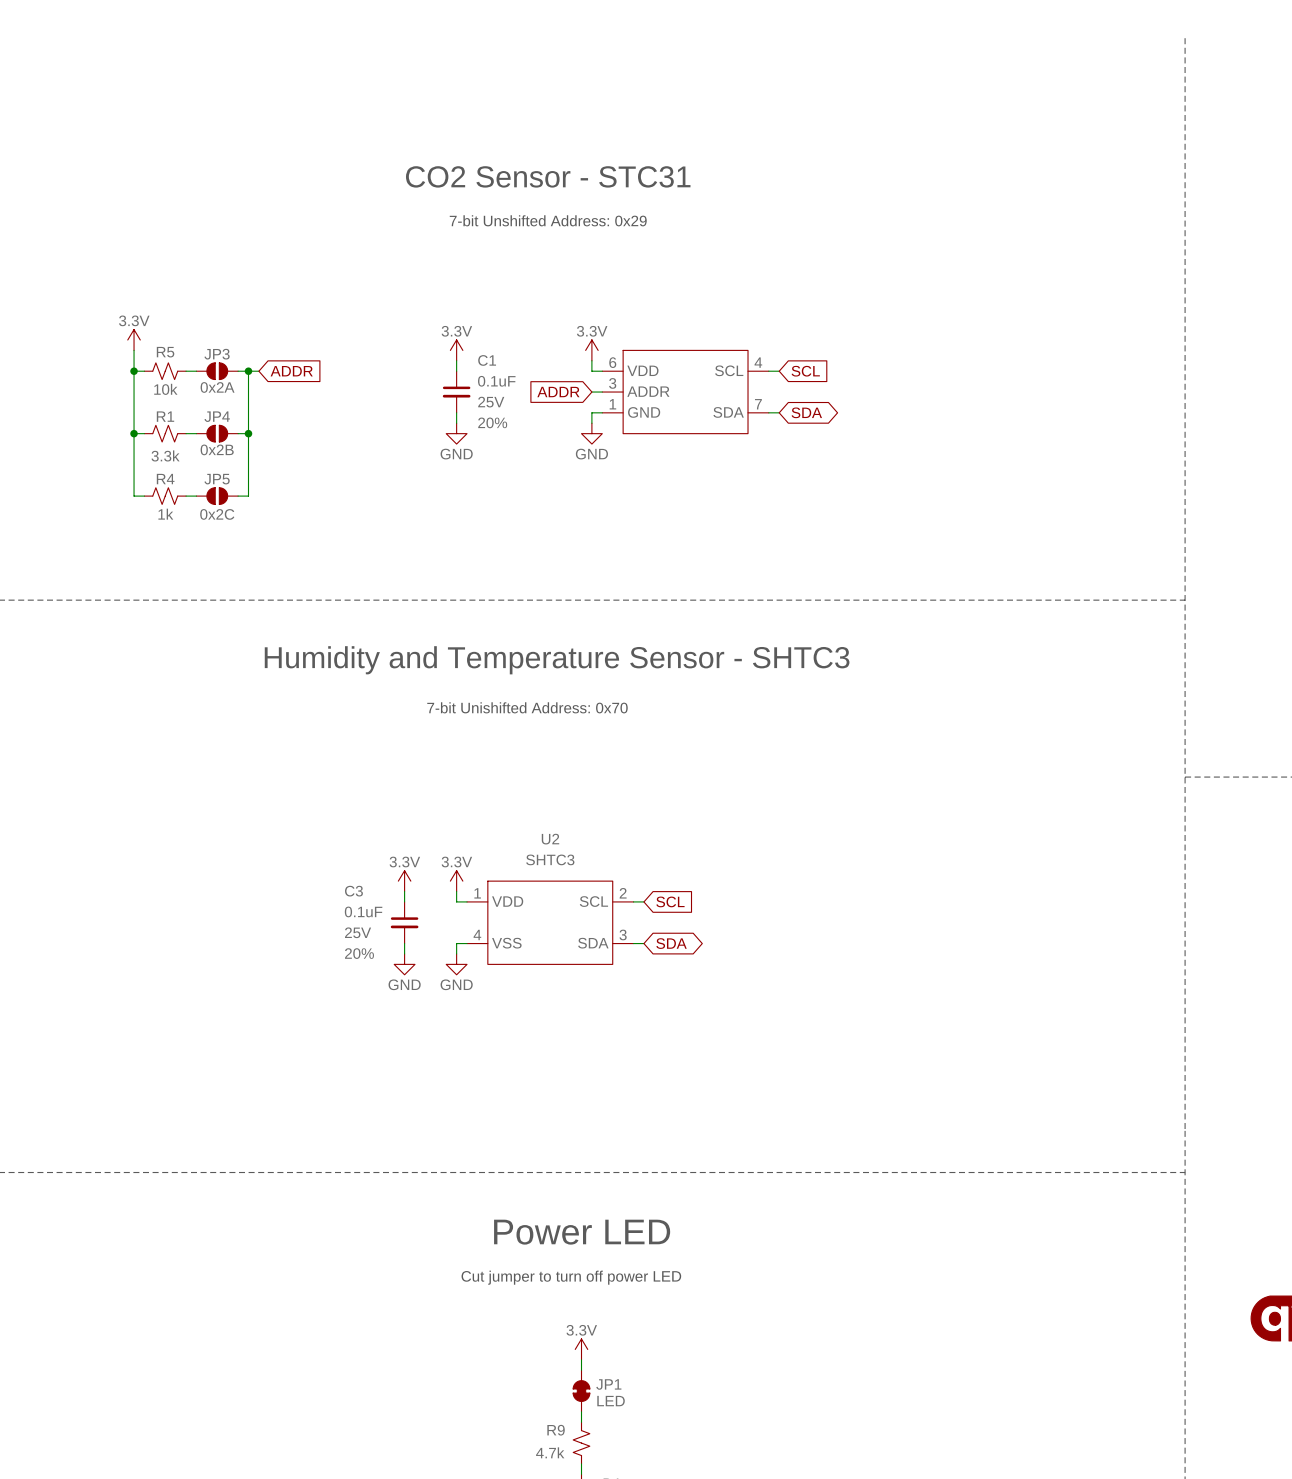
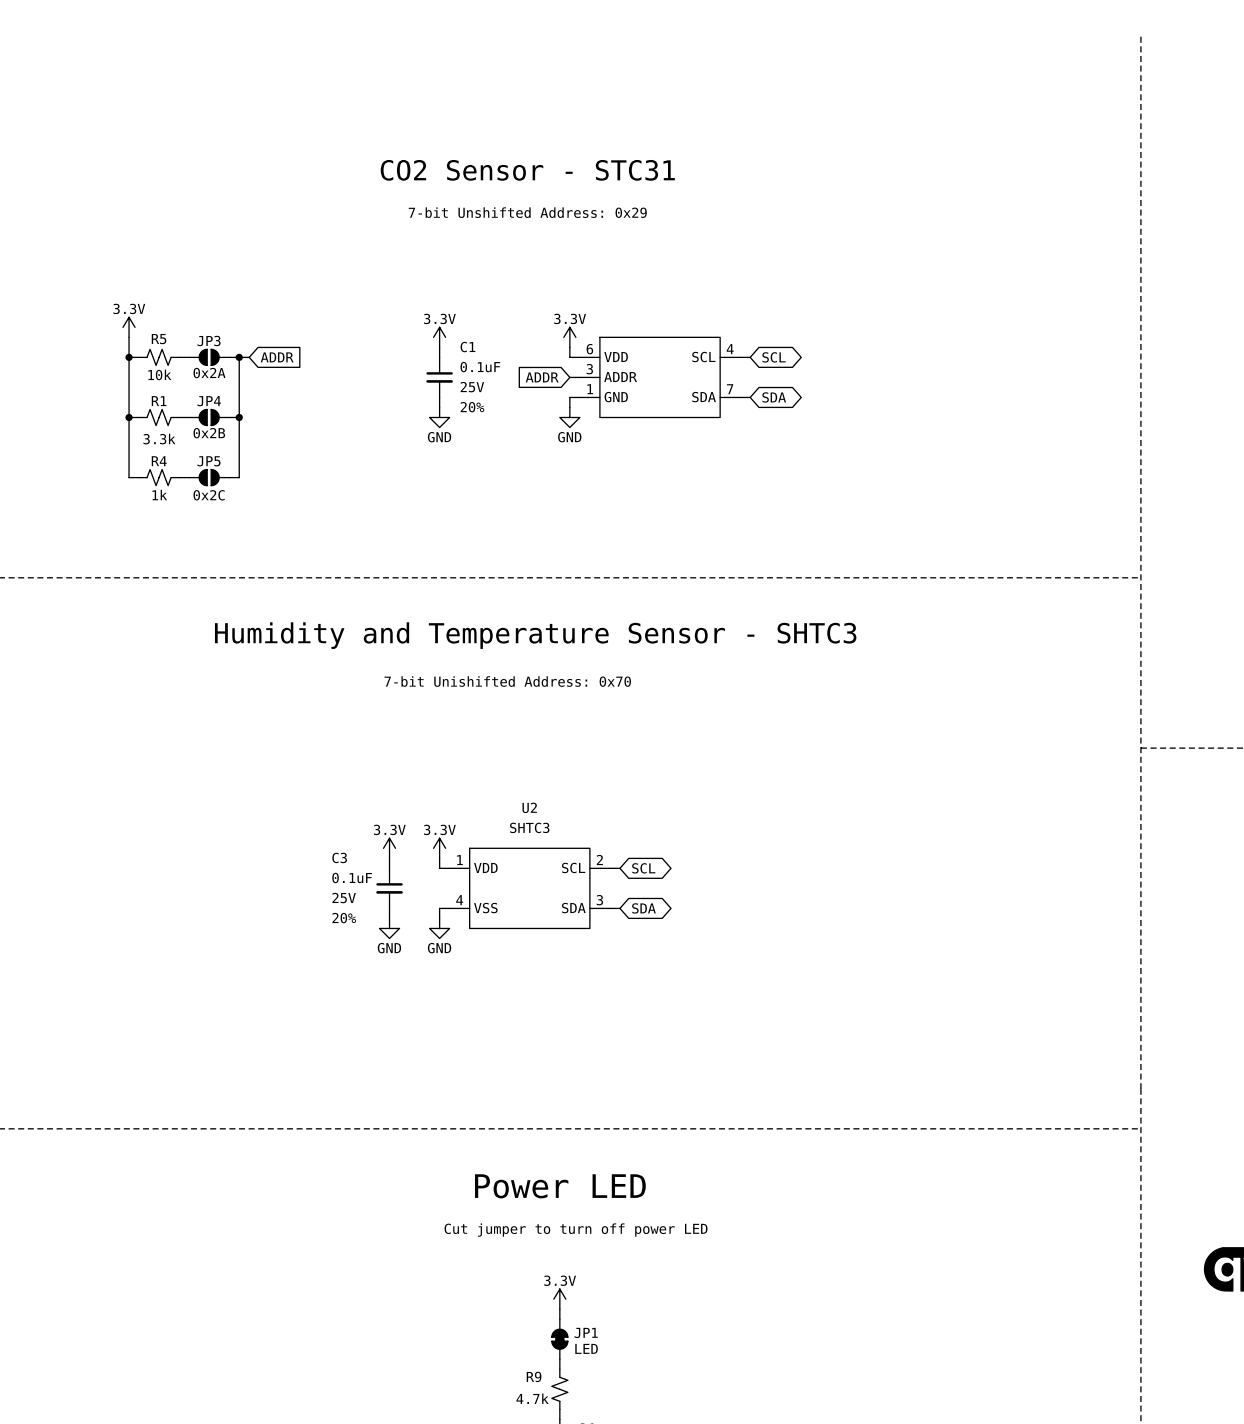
global label shape: input (805, 371) -> bidirectional (774, 357)
global label shape: input (670, 901) -> bidirectional (643, 868)

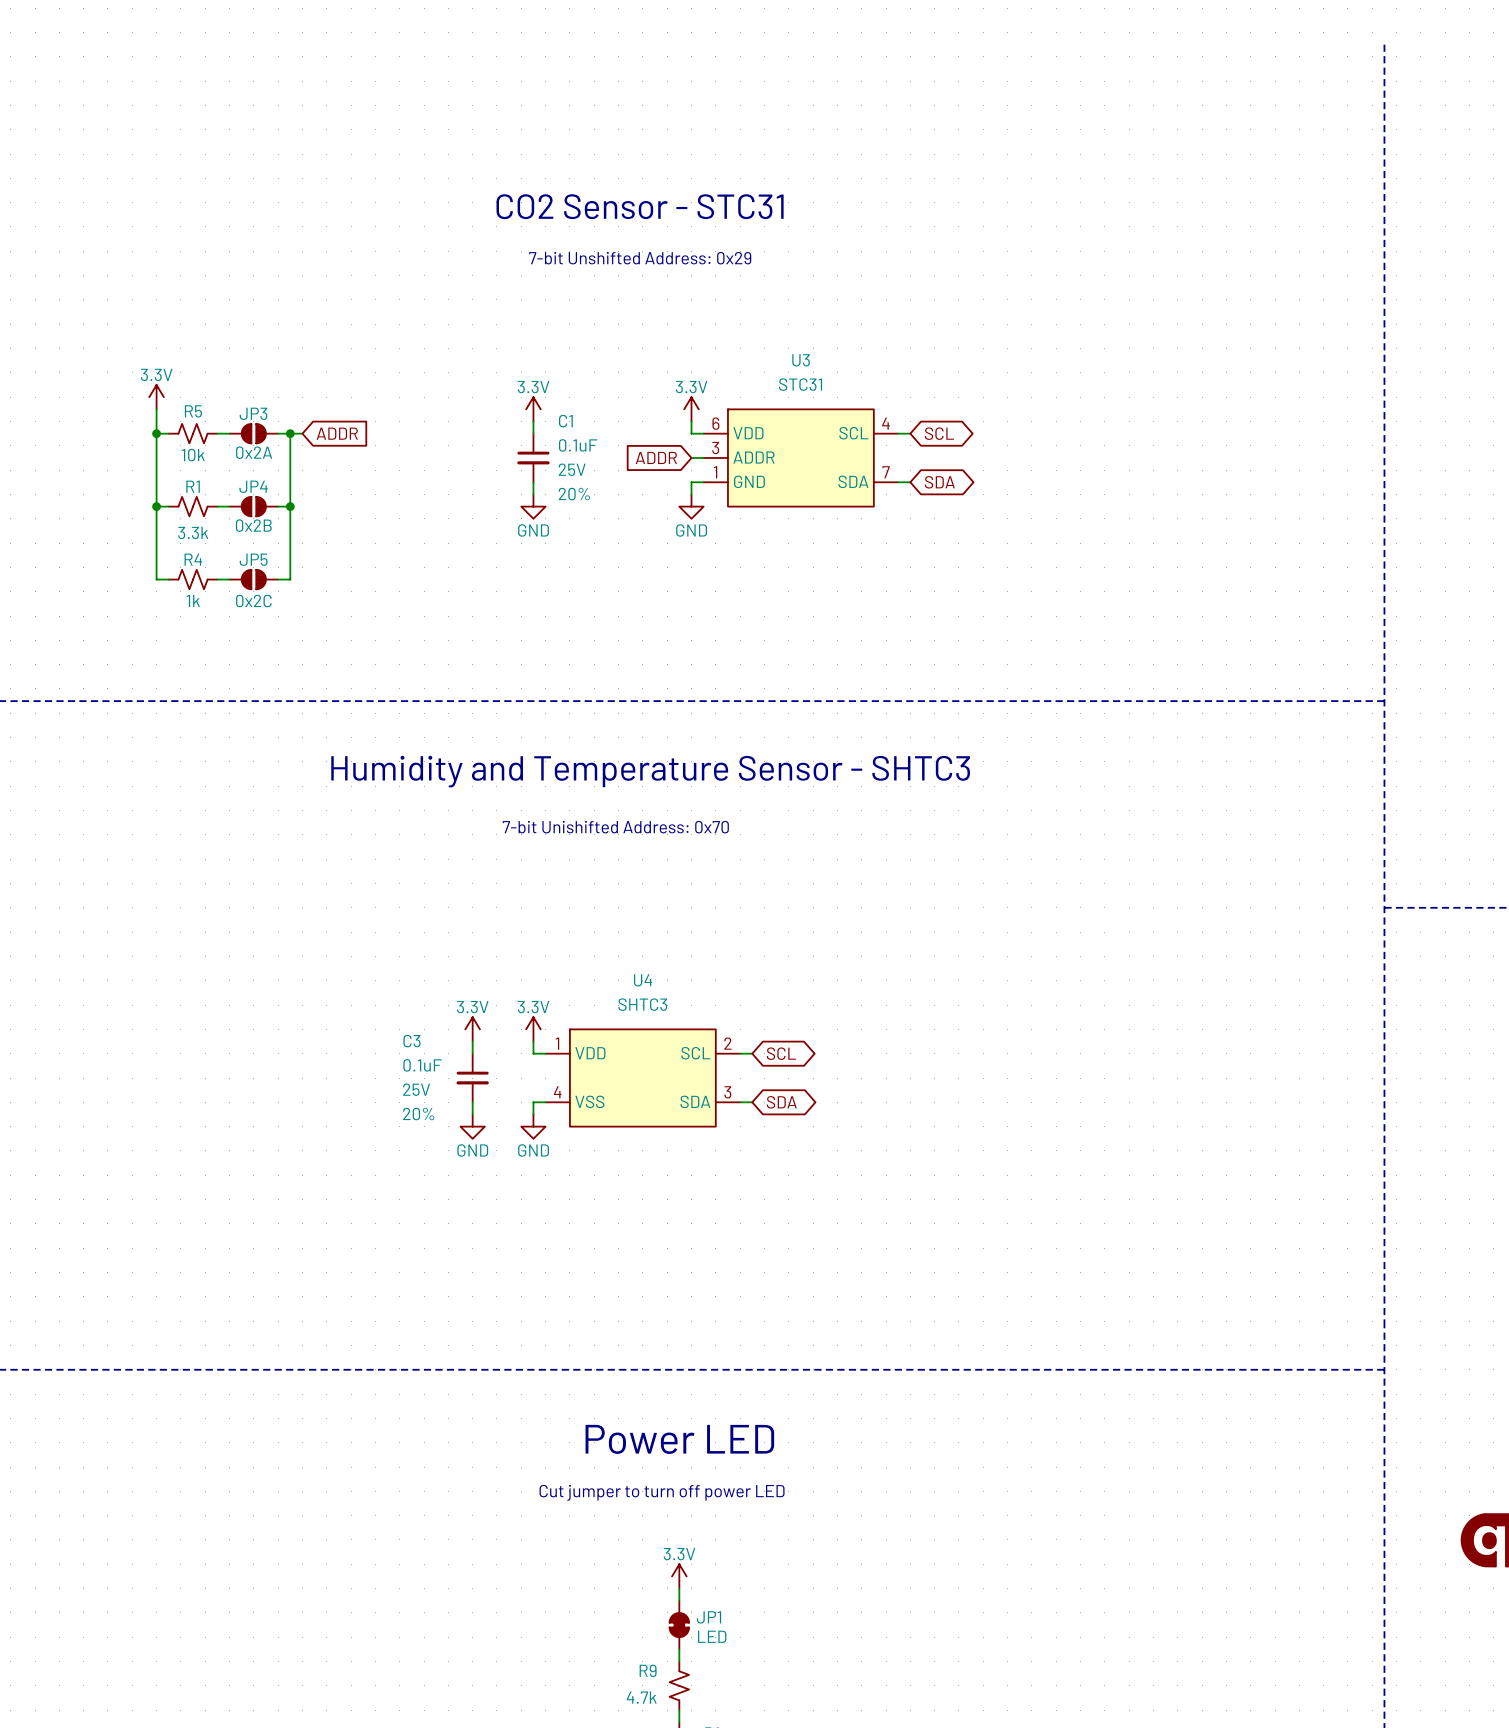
U3 name: none -> U3 (801, 360)
U3 value: none -> STC31 (800, 384)
U2 name: U2 (529, 807) -> U4 (643, 980)

